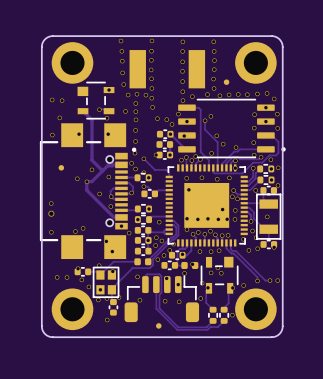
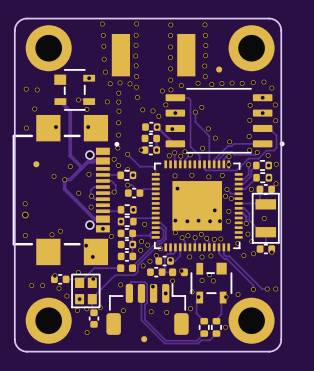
via: none -> (162, 90)

